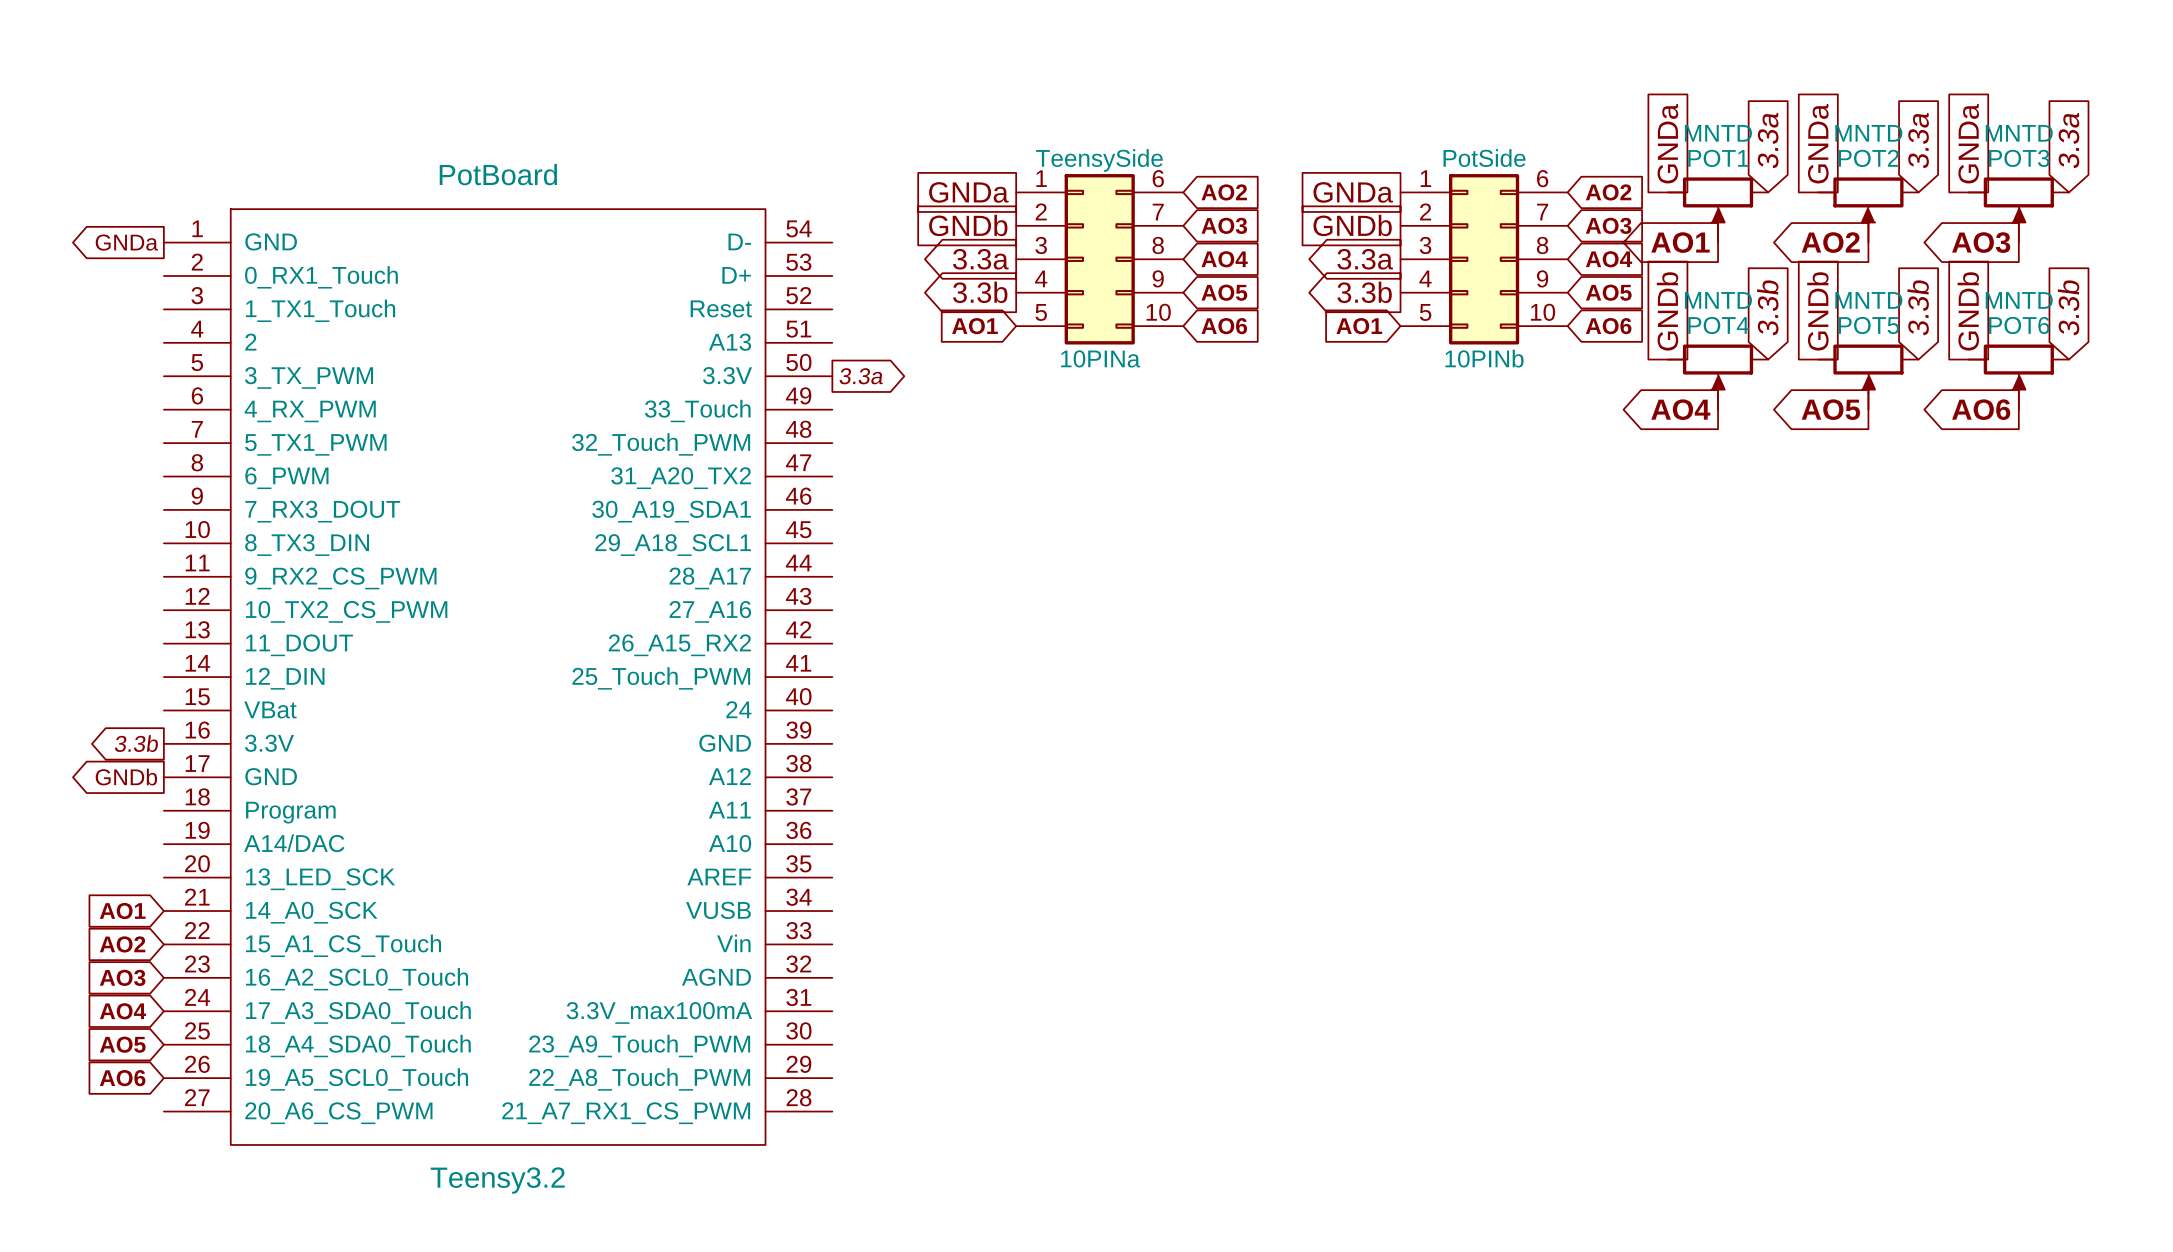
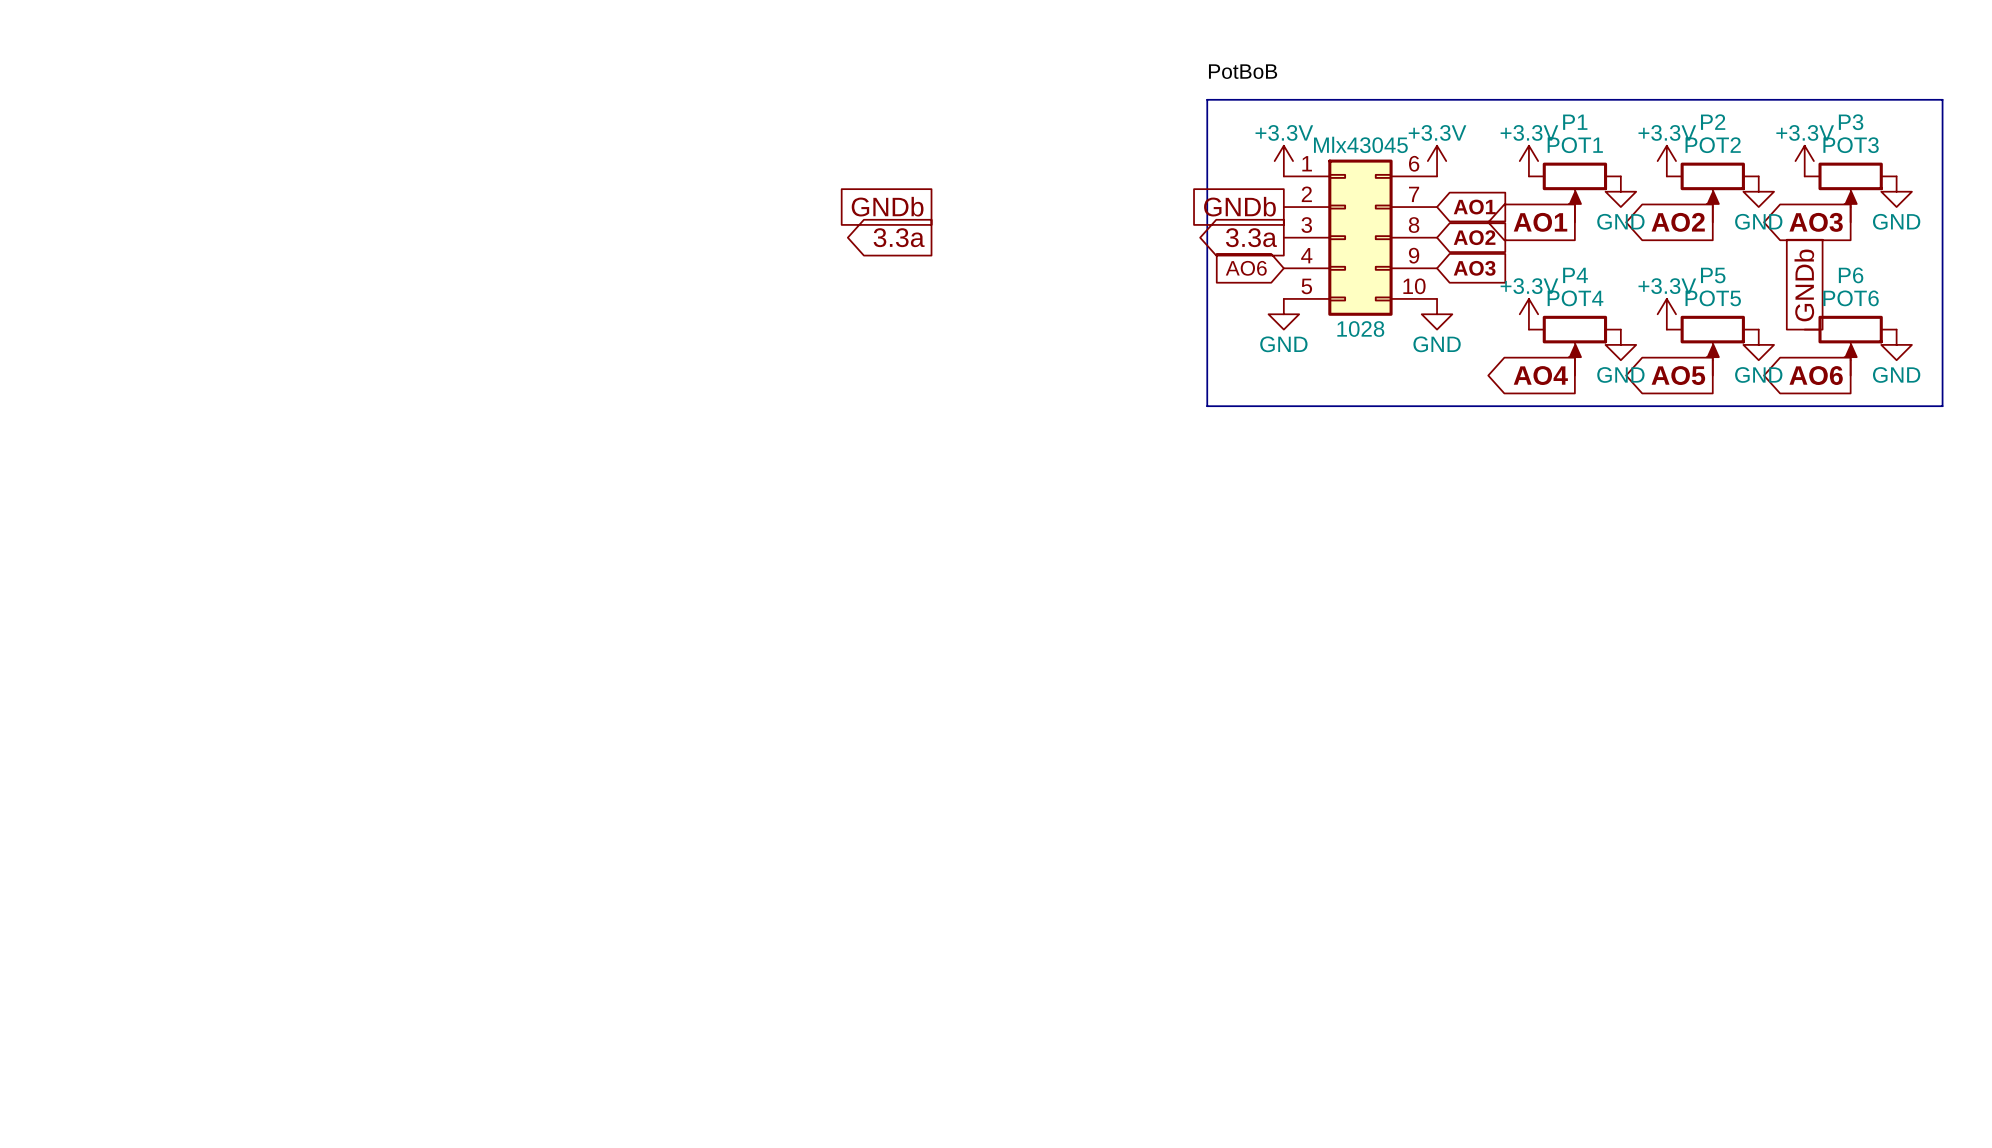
label: none -> PotBoB (1243, 71)
bus: none -> (1207, 99) (1942, 99) (1942, 406) (1207, 406) (1207, 99)
MNTD name: MNTD (1718, 133) -> P1 (1575, 122)
MNTD name: MNTD (2019, 133) -> P3 (1851, 122)
global label: 3.3a (1768, 140) -> none
global label: 3.3a (1918, 140) -> none
global label: 3.3a (2068, 140) -> none
global label: GNDa (1667, 143) -> none
global label: GNDa (1818, 143) -> none
global label: GNDa (1968, 143) -> none
PotSide name: PotSide (1484, 158) -> Mlx43045 (1360, 144)
power symbol: none -> +3.3V (1283, 161)
power symbol: none -> +3.3V (1437, 161)
power symbol: none -> +3.3V (1528, 161)
power symbol: none -> +3.3V (1666, 161)
power symbol: none -> +3.3V (1804, 161)
global label: GNDa (968, 192) -> none
global label: AO2 (1224, 192) -> none
global label: GNDa (1353, 192) -> none
global label: AO2 (1608, 192) -> none
power symbol: none -> GND (1620, 191)
MNTD: POT2 (1868, 209) -> none
P2: none -> POT2 (1712, 192)
power symbol: none -> GND (1758, 191)
power symbol: none -> GND (1896, 191)
global label: AO3 (1224, 225) -> none
global label: AO3 (1608, 225) -> AO1 (1474, 207)
global label: GNDa (126, 242) -> none
TeensySide: 10PINa (1099, 259) -> none
global label: AO4 (1224, 259) -> none
global label: AO4 (1609, 259) -> AO2 (1474, 237)
global label: 3.3b (980, 292) -> none
global label: AO5 (1224, 292) -> none
global label shape: output (1364, 292) -> input (1246, 268)
global label: 3.3b (1364, 292) -> AO6 (1246, 268)
global label: AO5 (1608, 292) -> AO3 (1474, 268)
MNTD name: MNTD (1718, 300) -> P4 (1575, 275)
MNTD name: MNTD (1868, 300) -> P5 (1713, 275)
MNTD name: MNTD (2019, 300) -> P6 (1851, 275)
global label: 3.3b (1767, 307) -> none
global label: 3.3b (1918, 307) -> none
global label: 3.3b (2068, 307) -> none
global label: GNDb (1667, 311) -> none
global label: GNDb (1817, 311) -> none
global label: AO1 (974, 326) -> none
global label: AO6 (1224, 326) -> none
global label: AO1 (1359, 326) -> none
global label: AO6 (1608, 326) -> none
power symbol: none -> GND (1283, 314)
power symbol: none -> GND (1437, 314)
power symbol: none -> +3.3V (1528, 314)
power symbol: none -> +3.3V (1666, 314)
PotSide value: 10PINb (1484, 358) -> 1028 (1360, 329)
global label: 3.3a (861, 376) -> none
power symbol: none -> GND (1620, 344)
power symbol: none -> GND (1758, 344)
power symbol: none -> GND (1896, 344)
PotBoard: Teensy3.2 (498, 677) -> none
global label: 3.3b (136, 743) -> none
global label: GNDb (126, 777) -> none
global label: AO1 (122, 911) -> none
global label: AO2 (122, 944) -> none
global label: AO3 (122, 977) -> none
global label: AO4 (122, 1011) -> none
global label: AO5 (122, 1044) -> none
global label: AO6 (122, 1078) -> none

